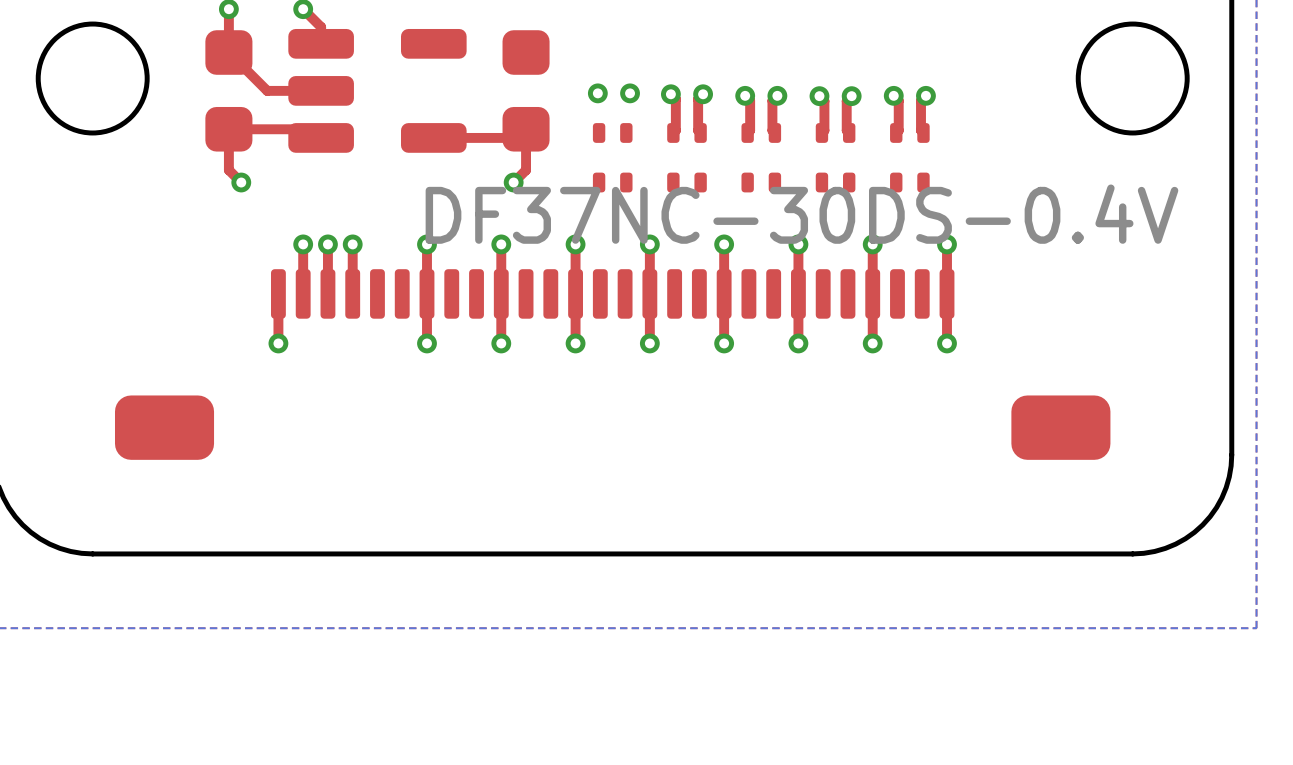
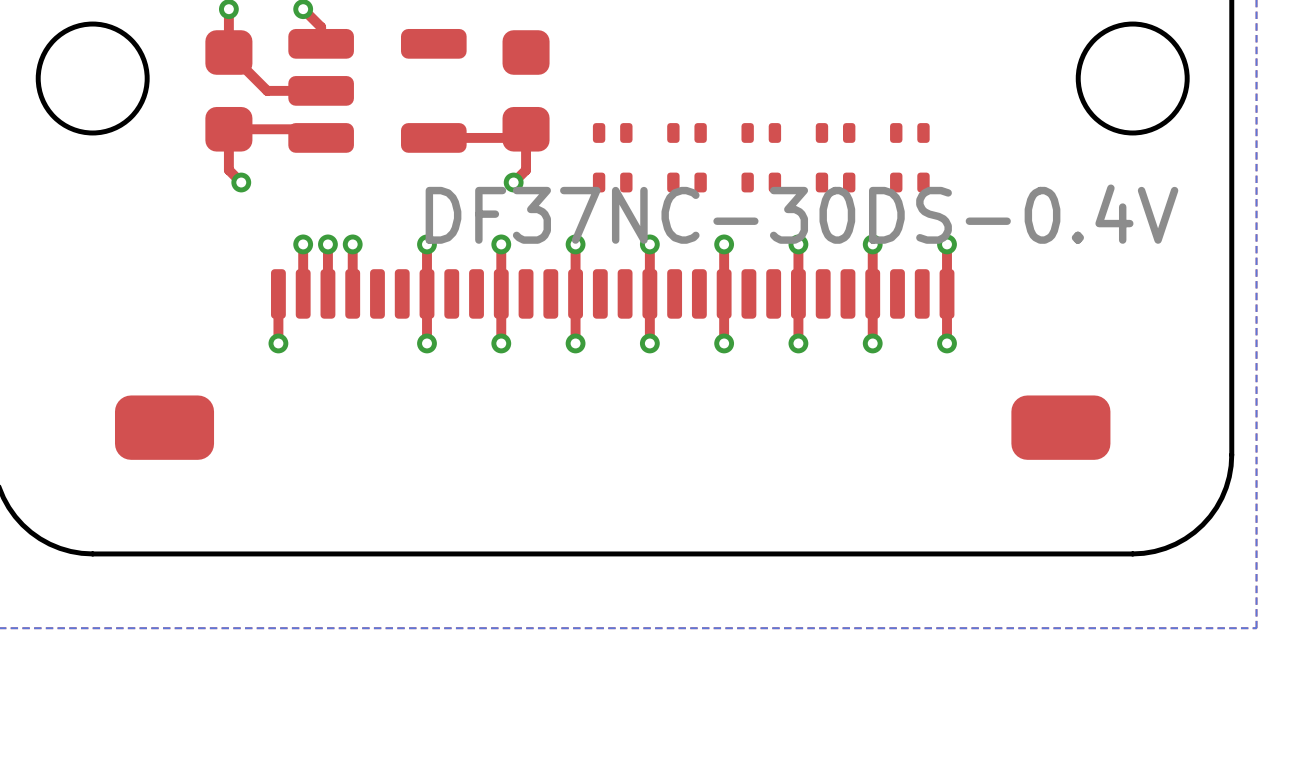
via: (597, 93) -> none
via: (630, 93) -> none
top track: (670, 94) (675, 99) (675, 130) (673, 132) -> none
via: (670, 94) -> none
top track: (703, 94) (698, 99) (698, 130) (700, 132) -> none
via: (703, 94) -> none
top track: (745, 95) (750, 100) (750, 130) (747, 132) -> none
via: (745, 95) -> none
top track: (777, 95) (772, 100) (772, 130) (774, 132) -> none
via: (777, 95) -> none
top track: (893, 95) (898, 100) (898, 130) (896, 132) -> none
via: (893, 95) -> none
top track: (925, 95) (921, 100) (921, 130) (923, 132) -> none
via: (925, 95) -> none
top track: (819, 96) (824, 101) (824, 130) (821, 132) -> none
via: (819, 96) -> none
top track: (851, 96) (846, 101) (846, 130) (849, 132) -> none
via: (851, 96) -> none

